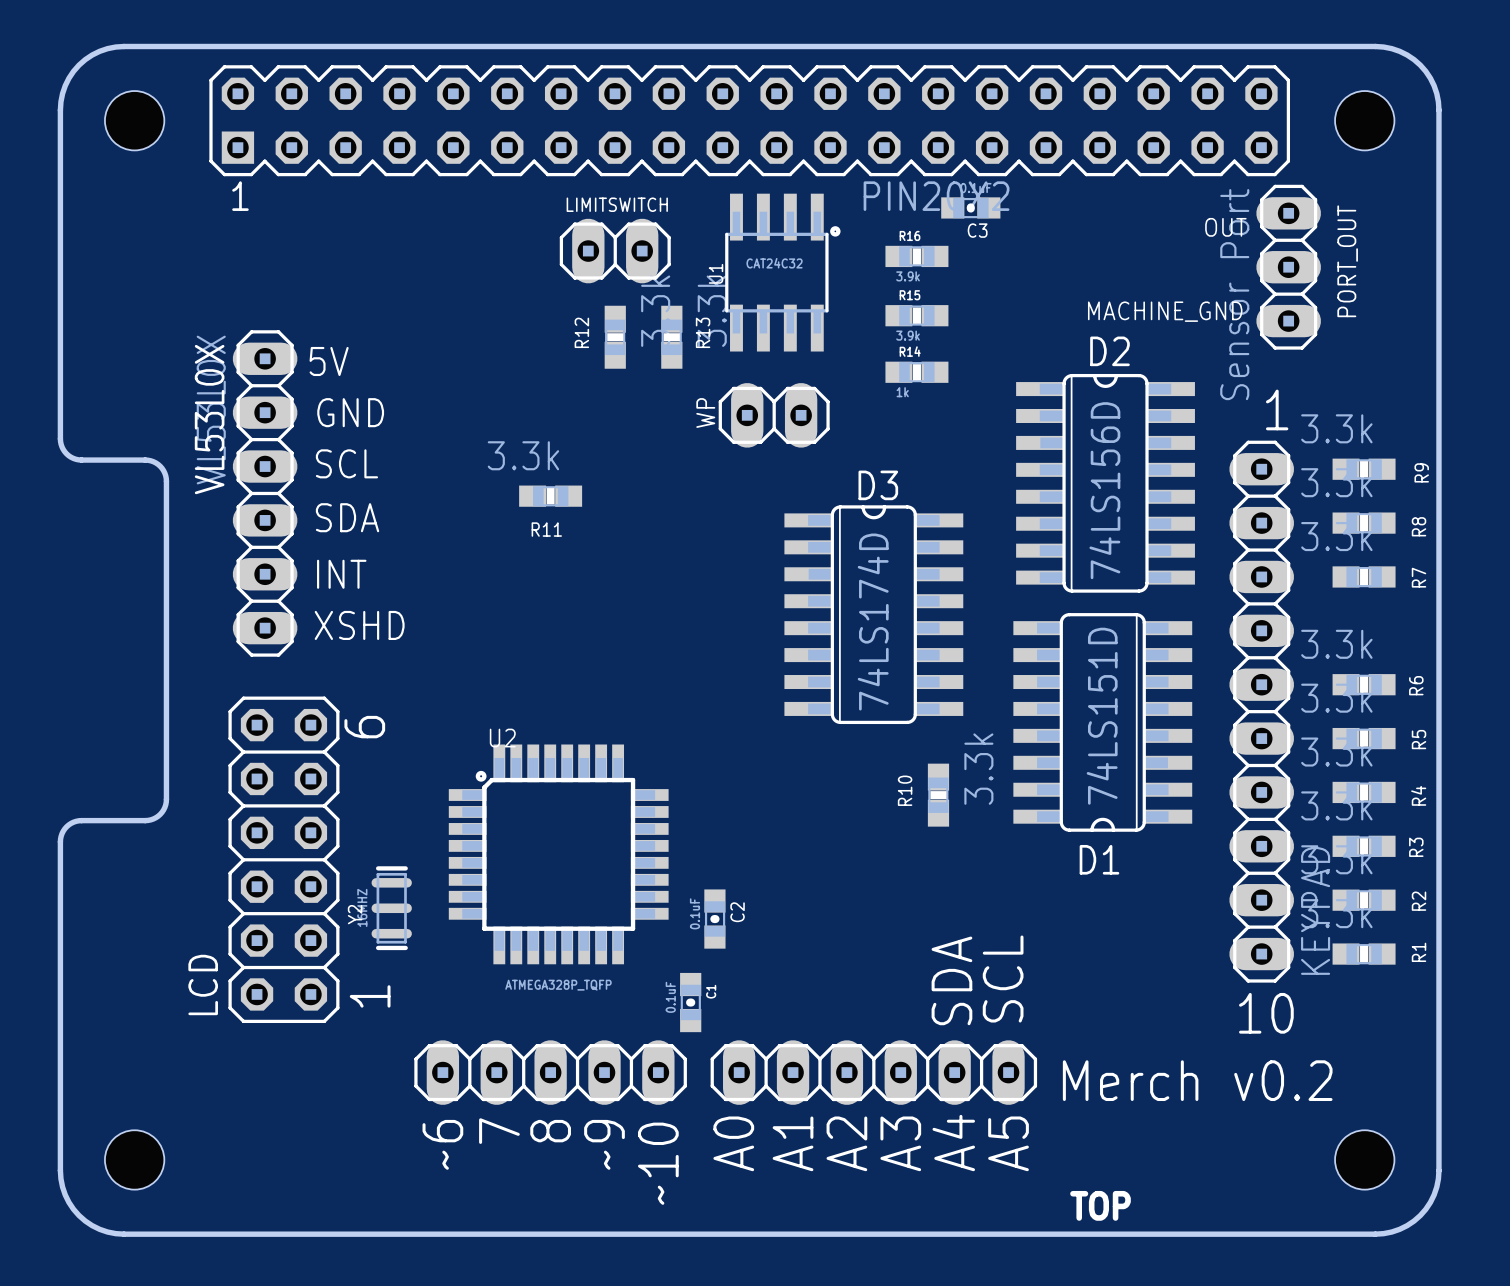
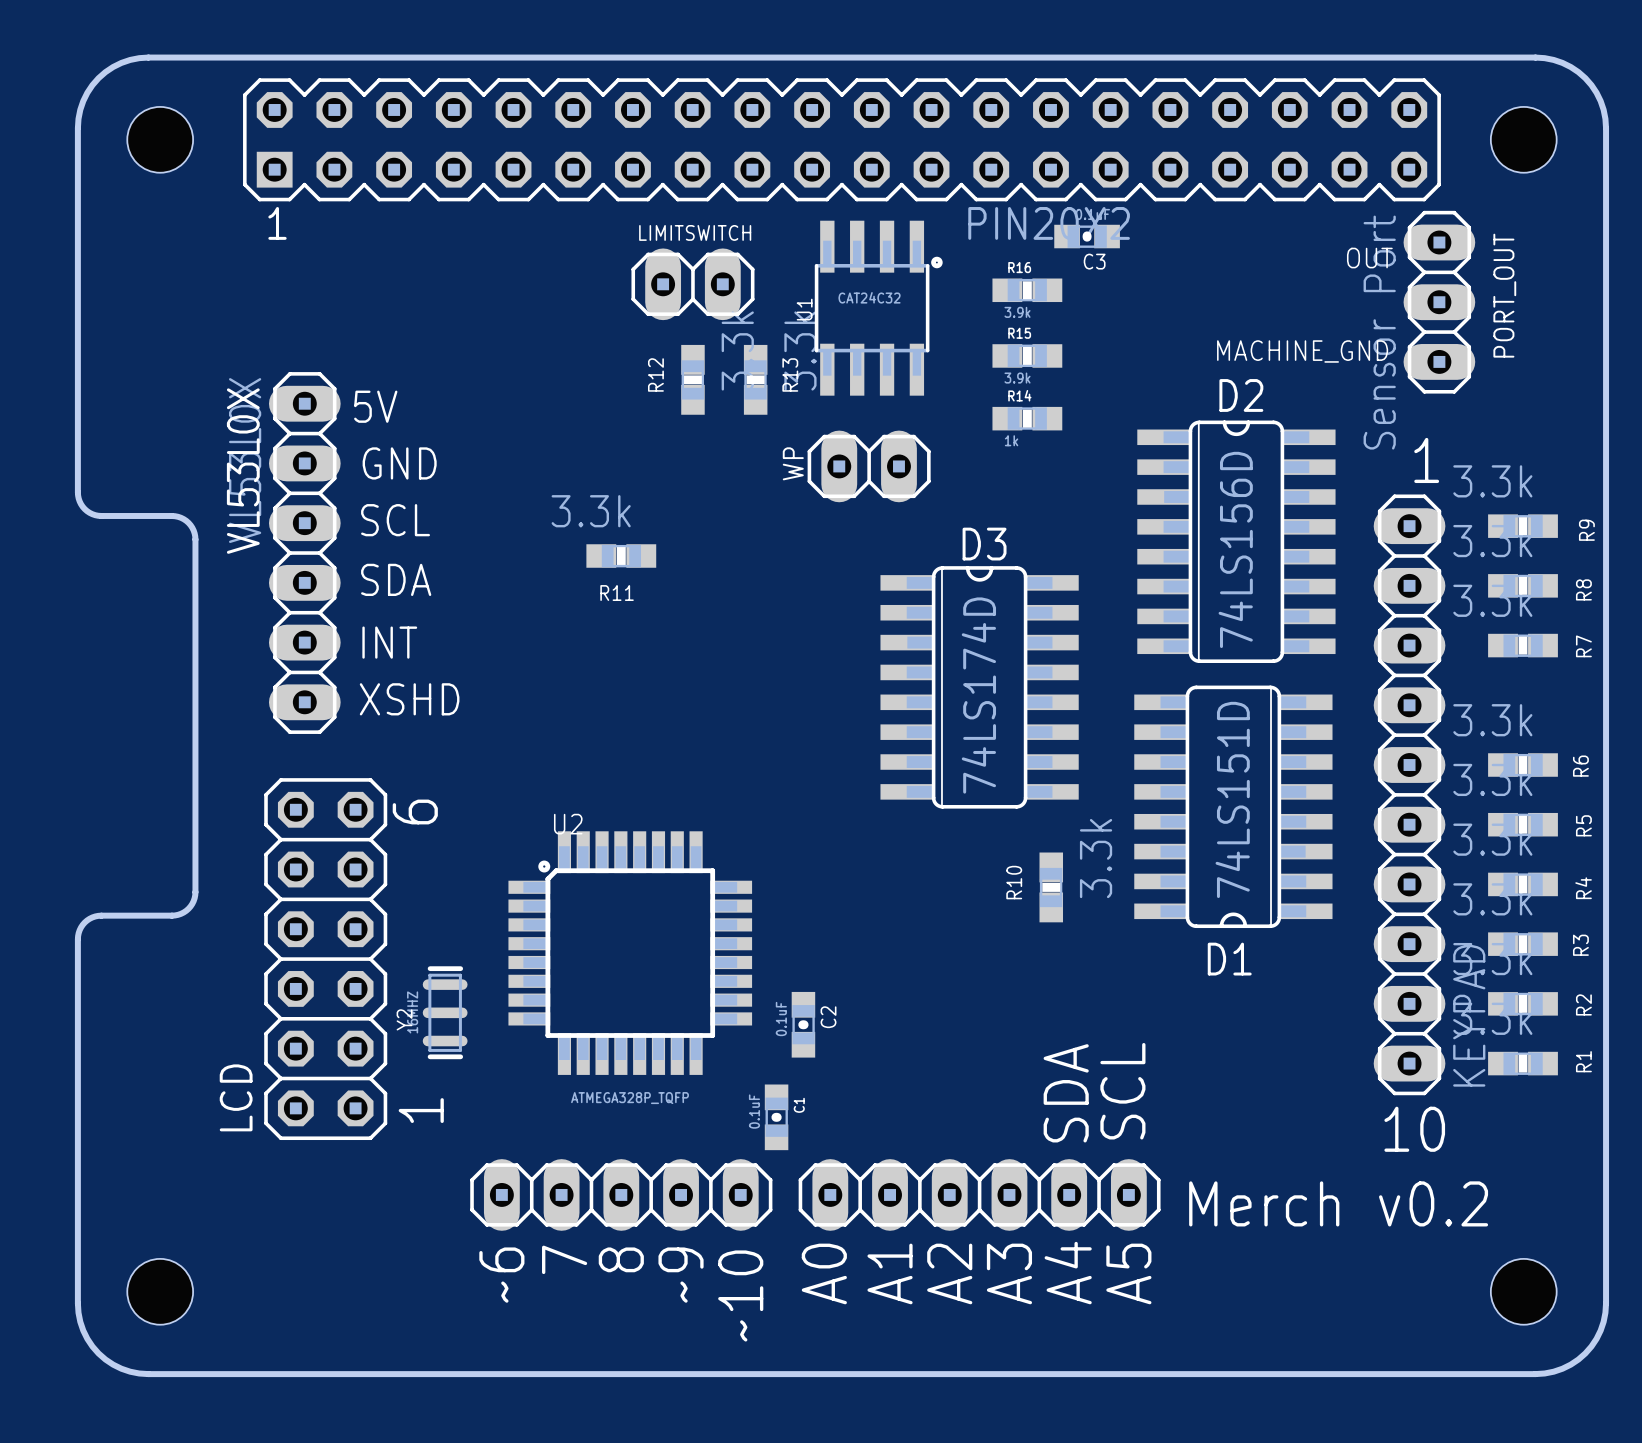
text: TOP (1100, 1205) -> none

